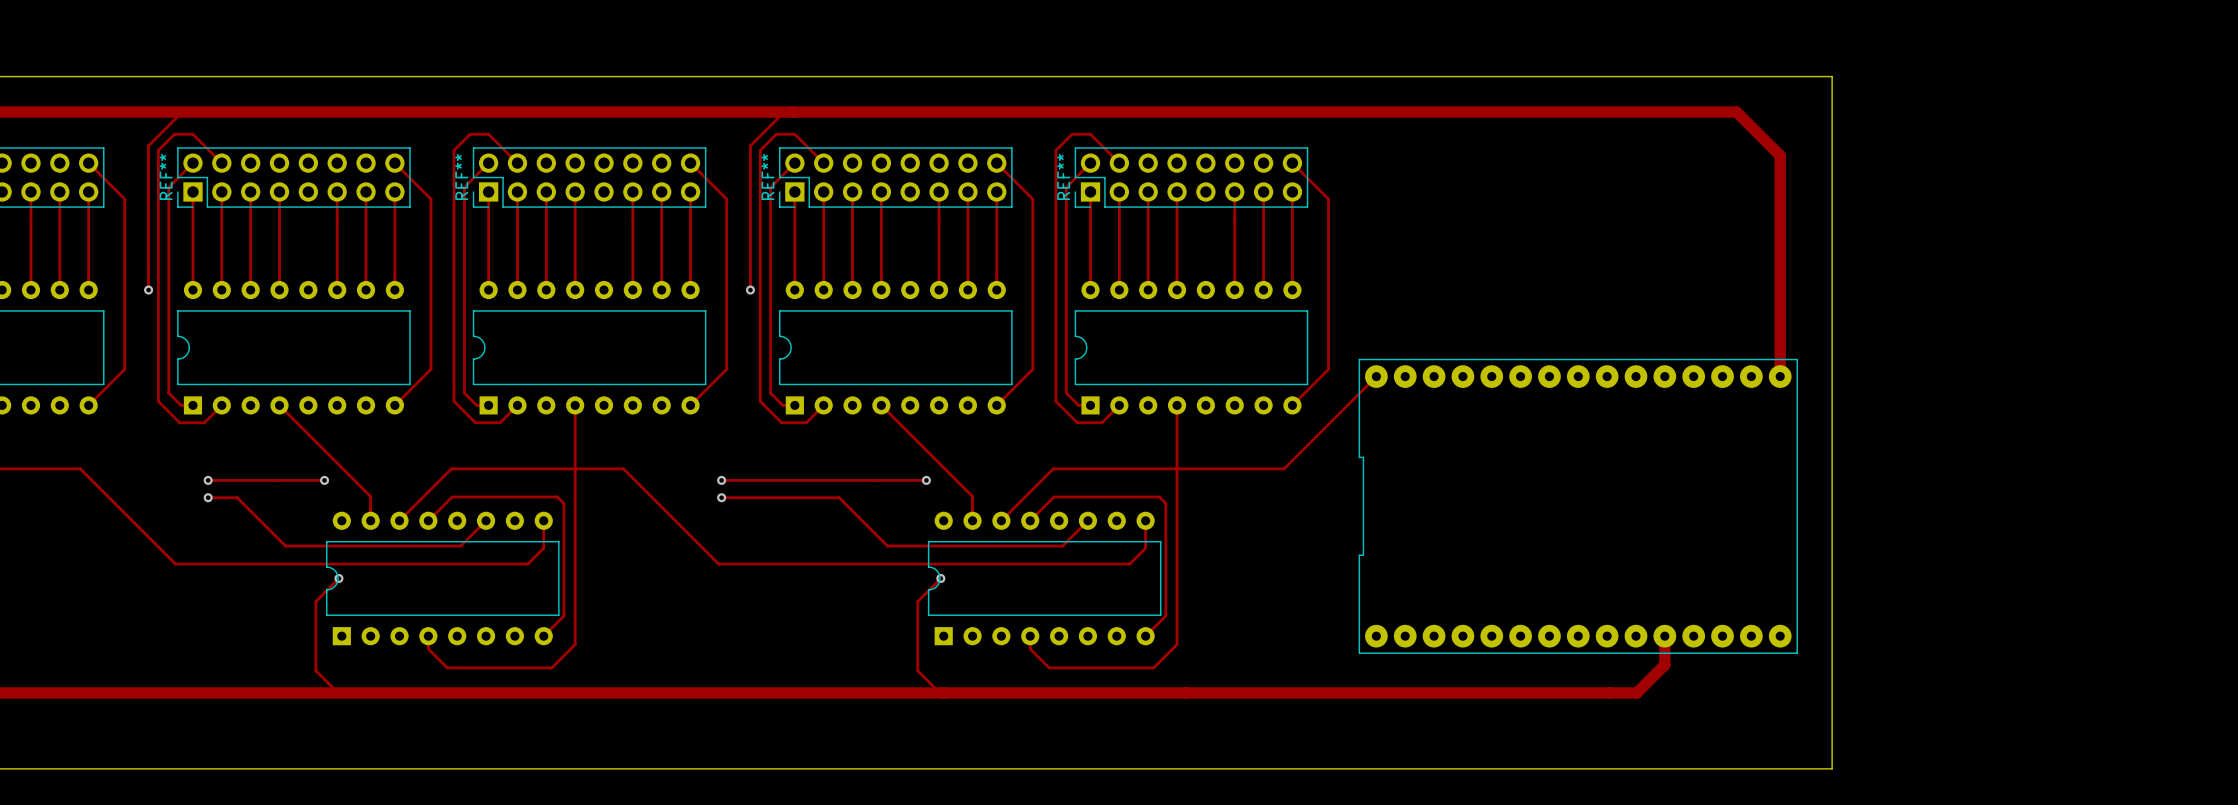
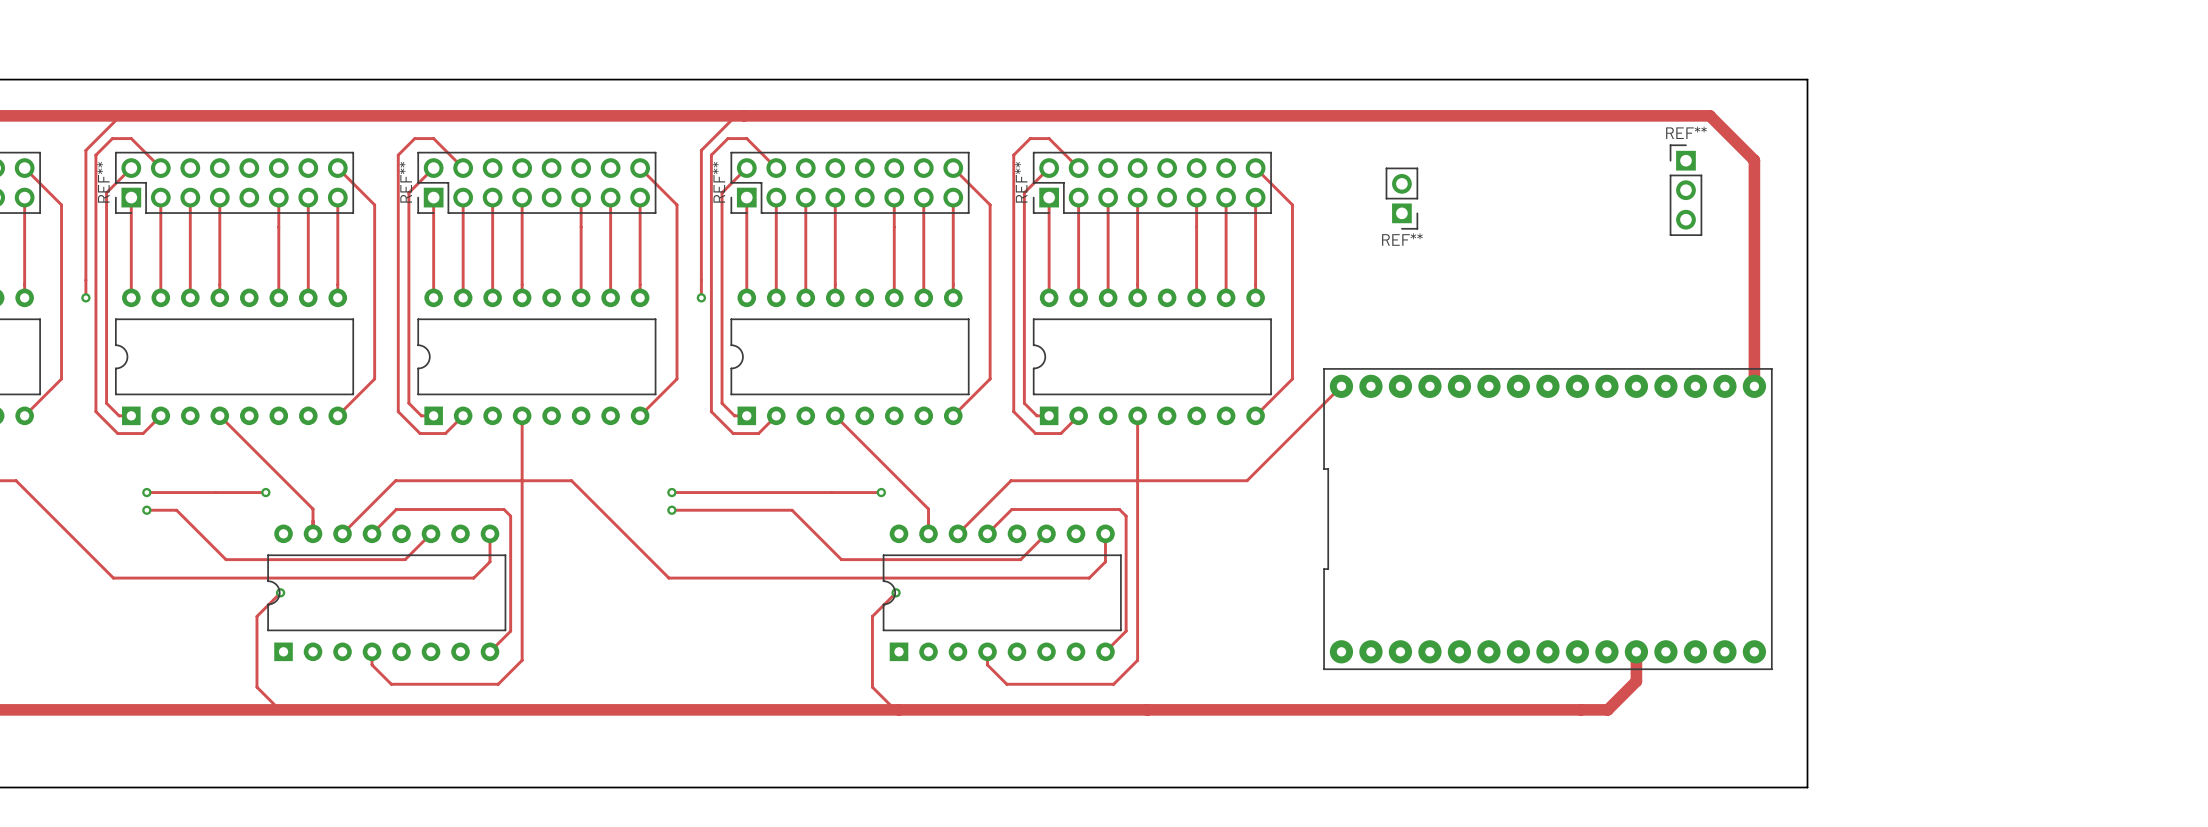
REF**: none -> (1685, 190)
REF**: none -> (1401, 198)

